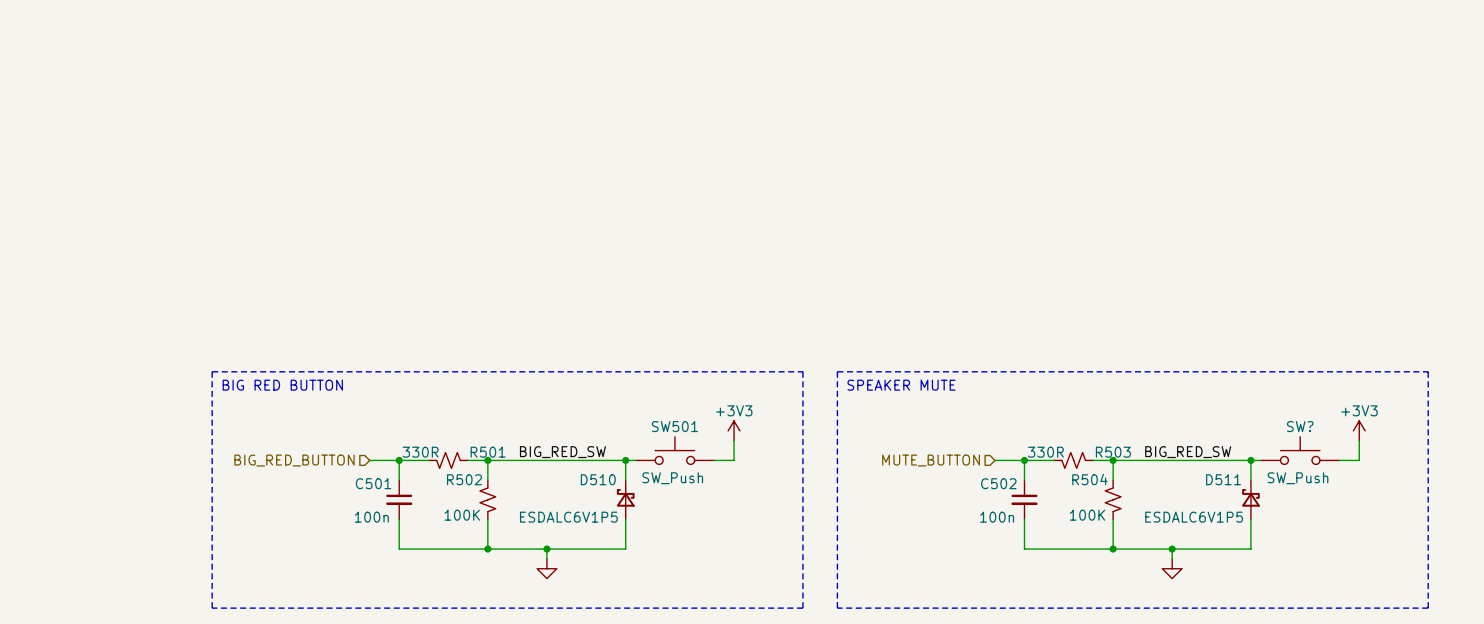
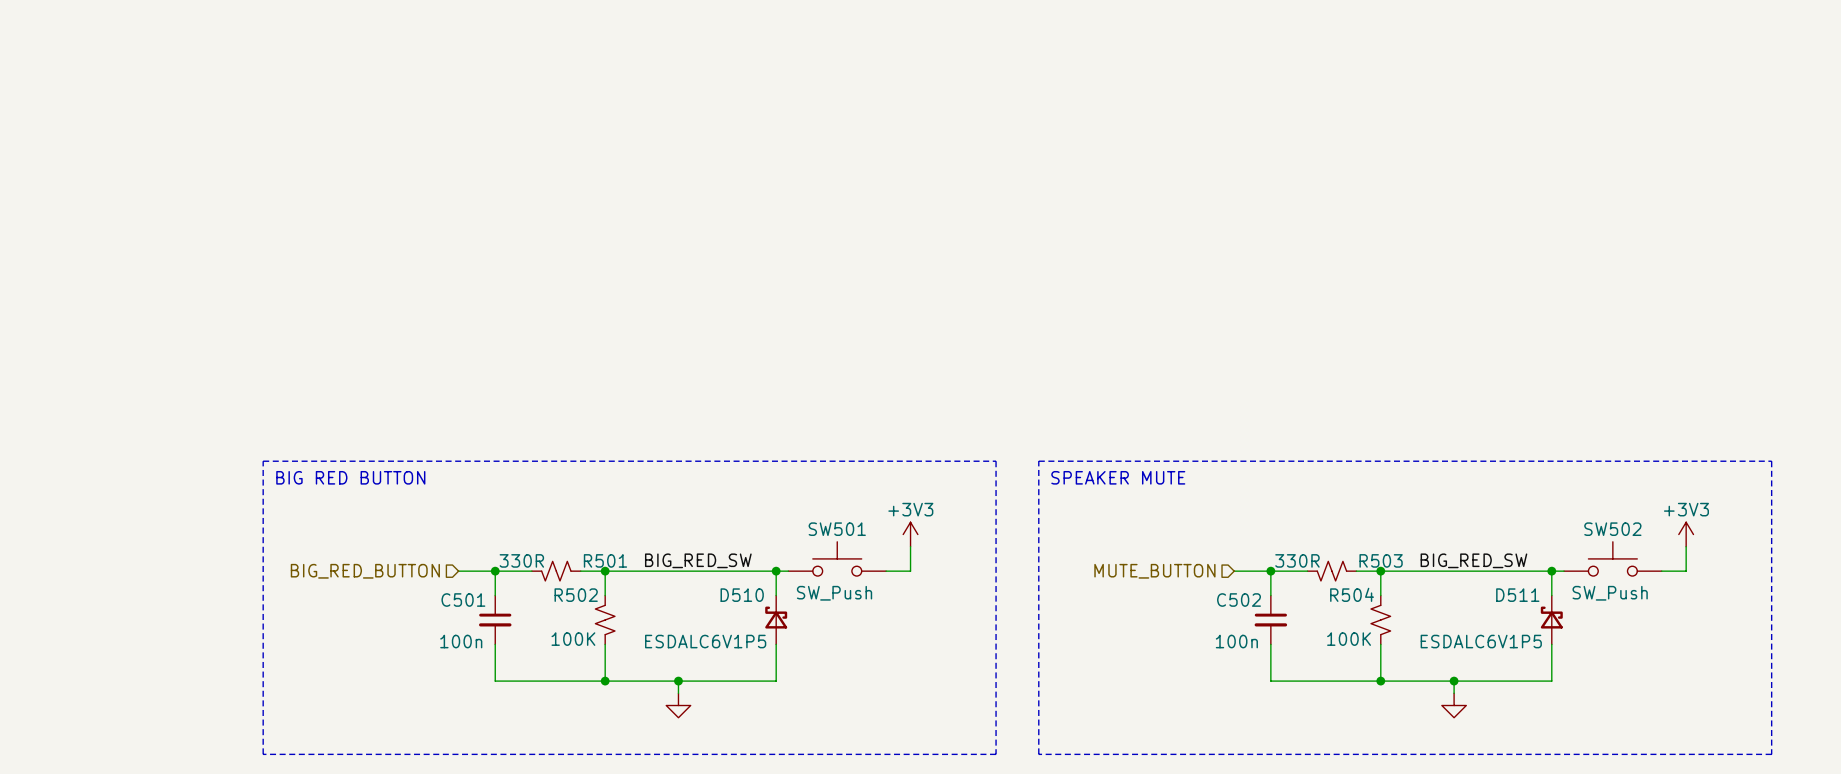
SW? name: SW? (1300, 426) -> SW502 (1612, 529)

